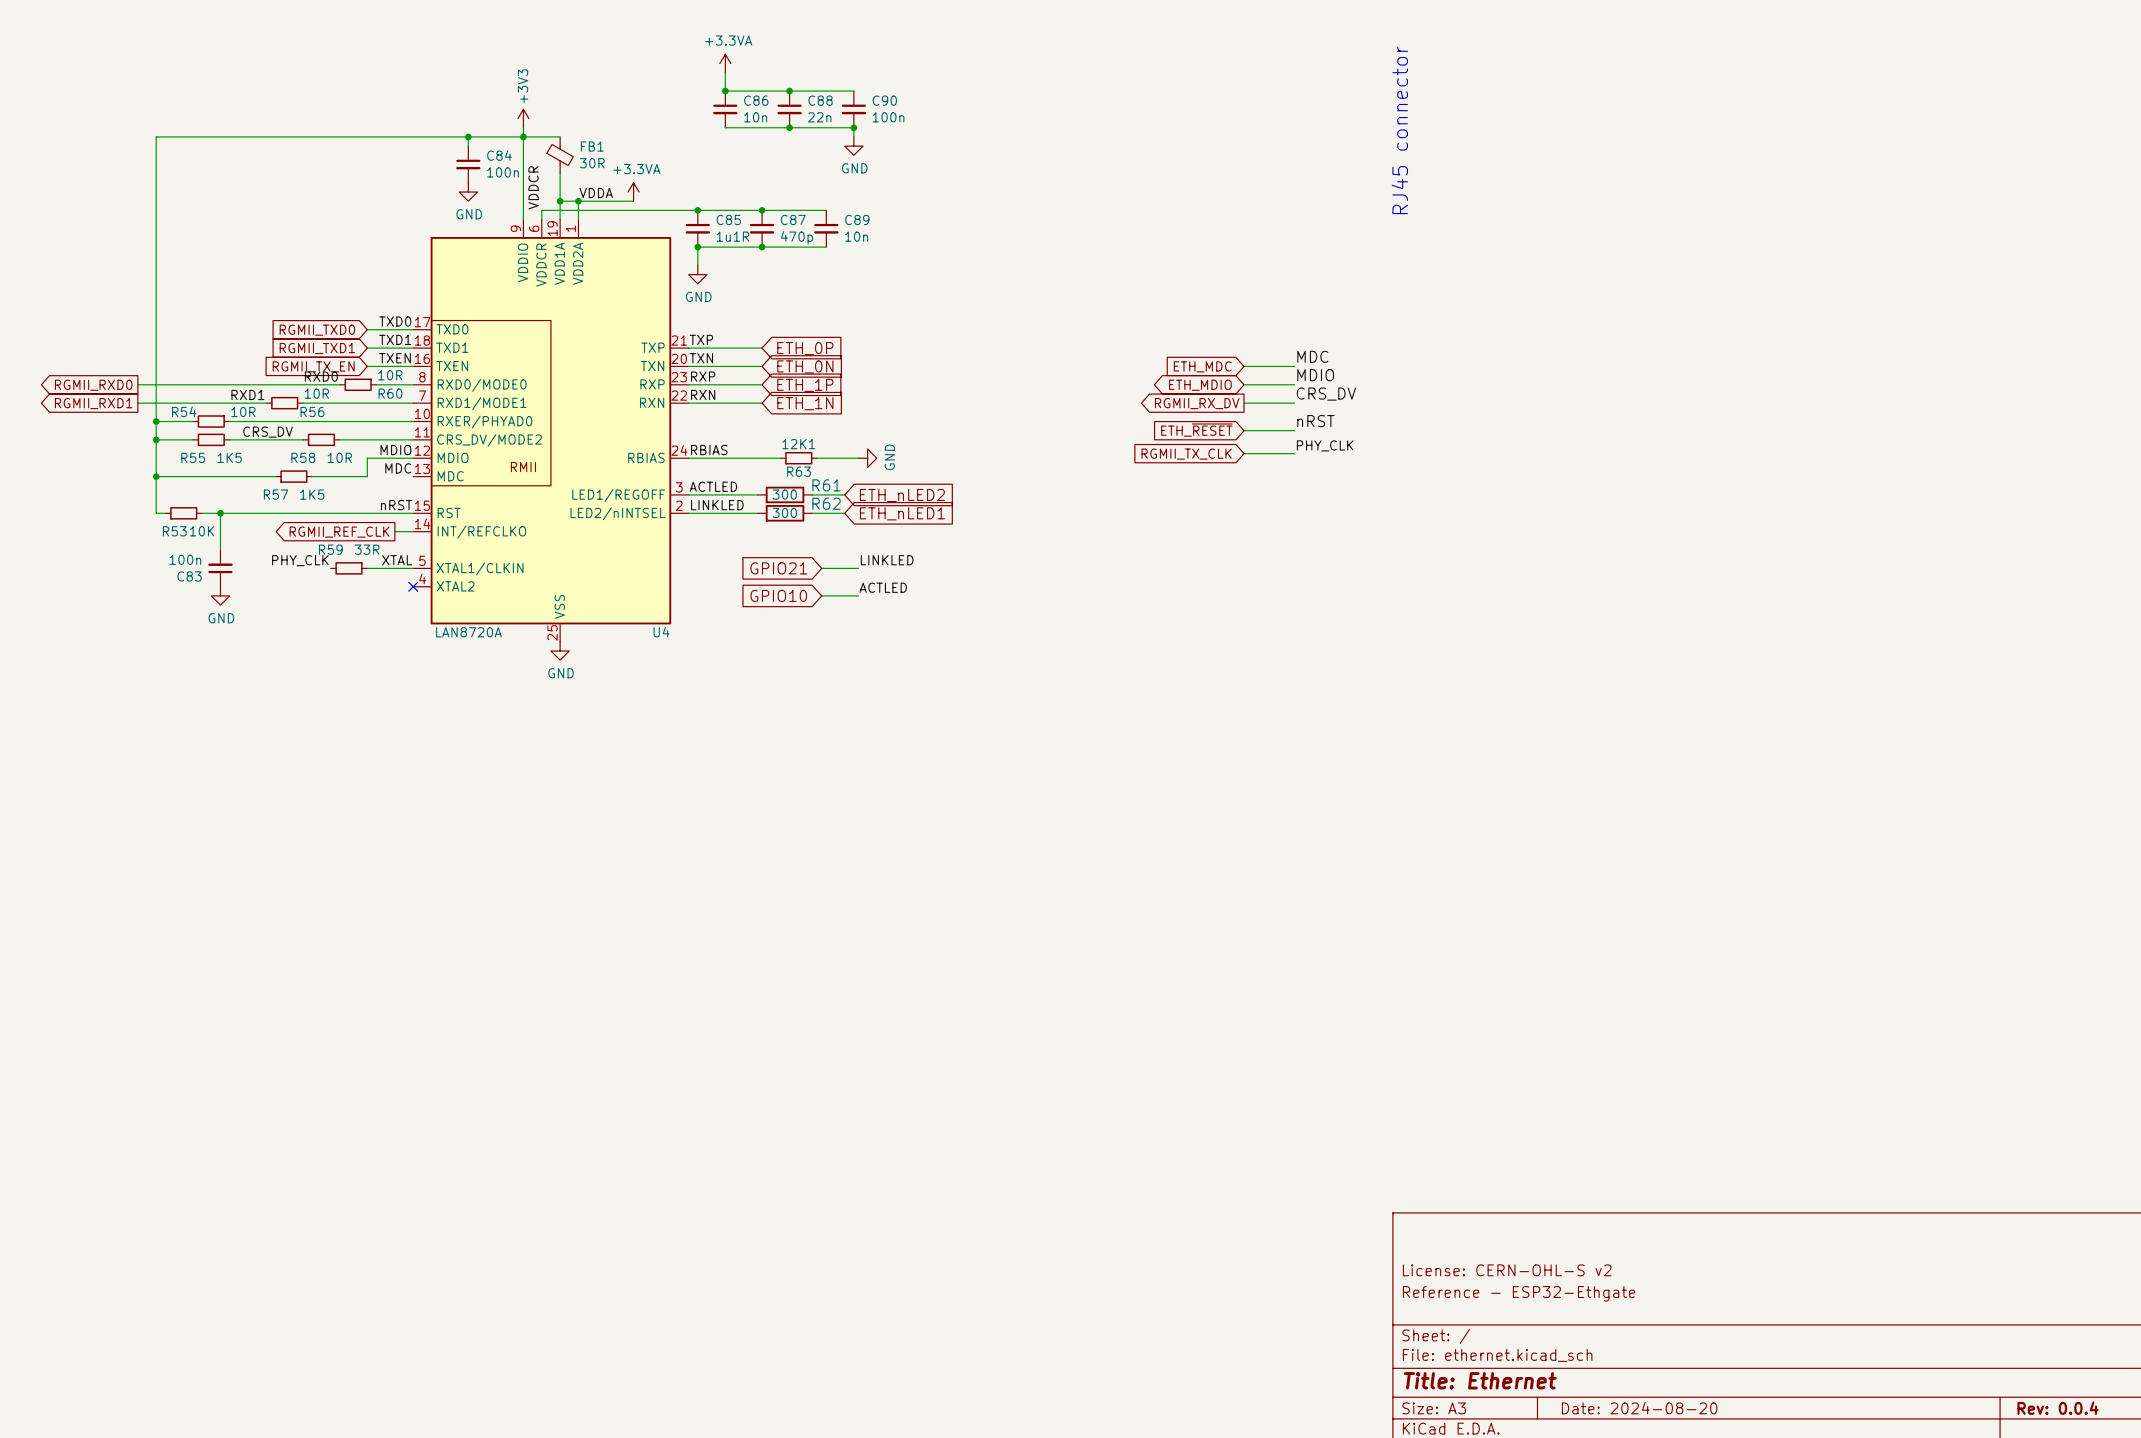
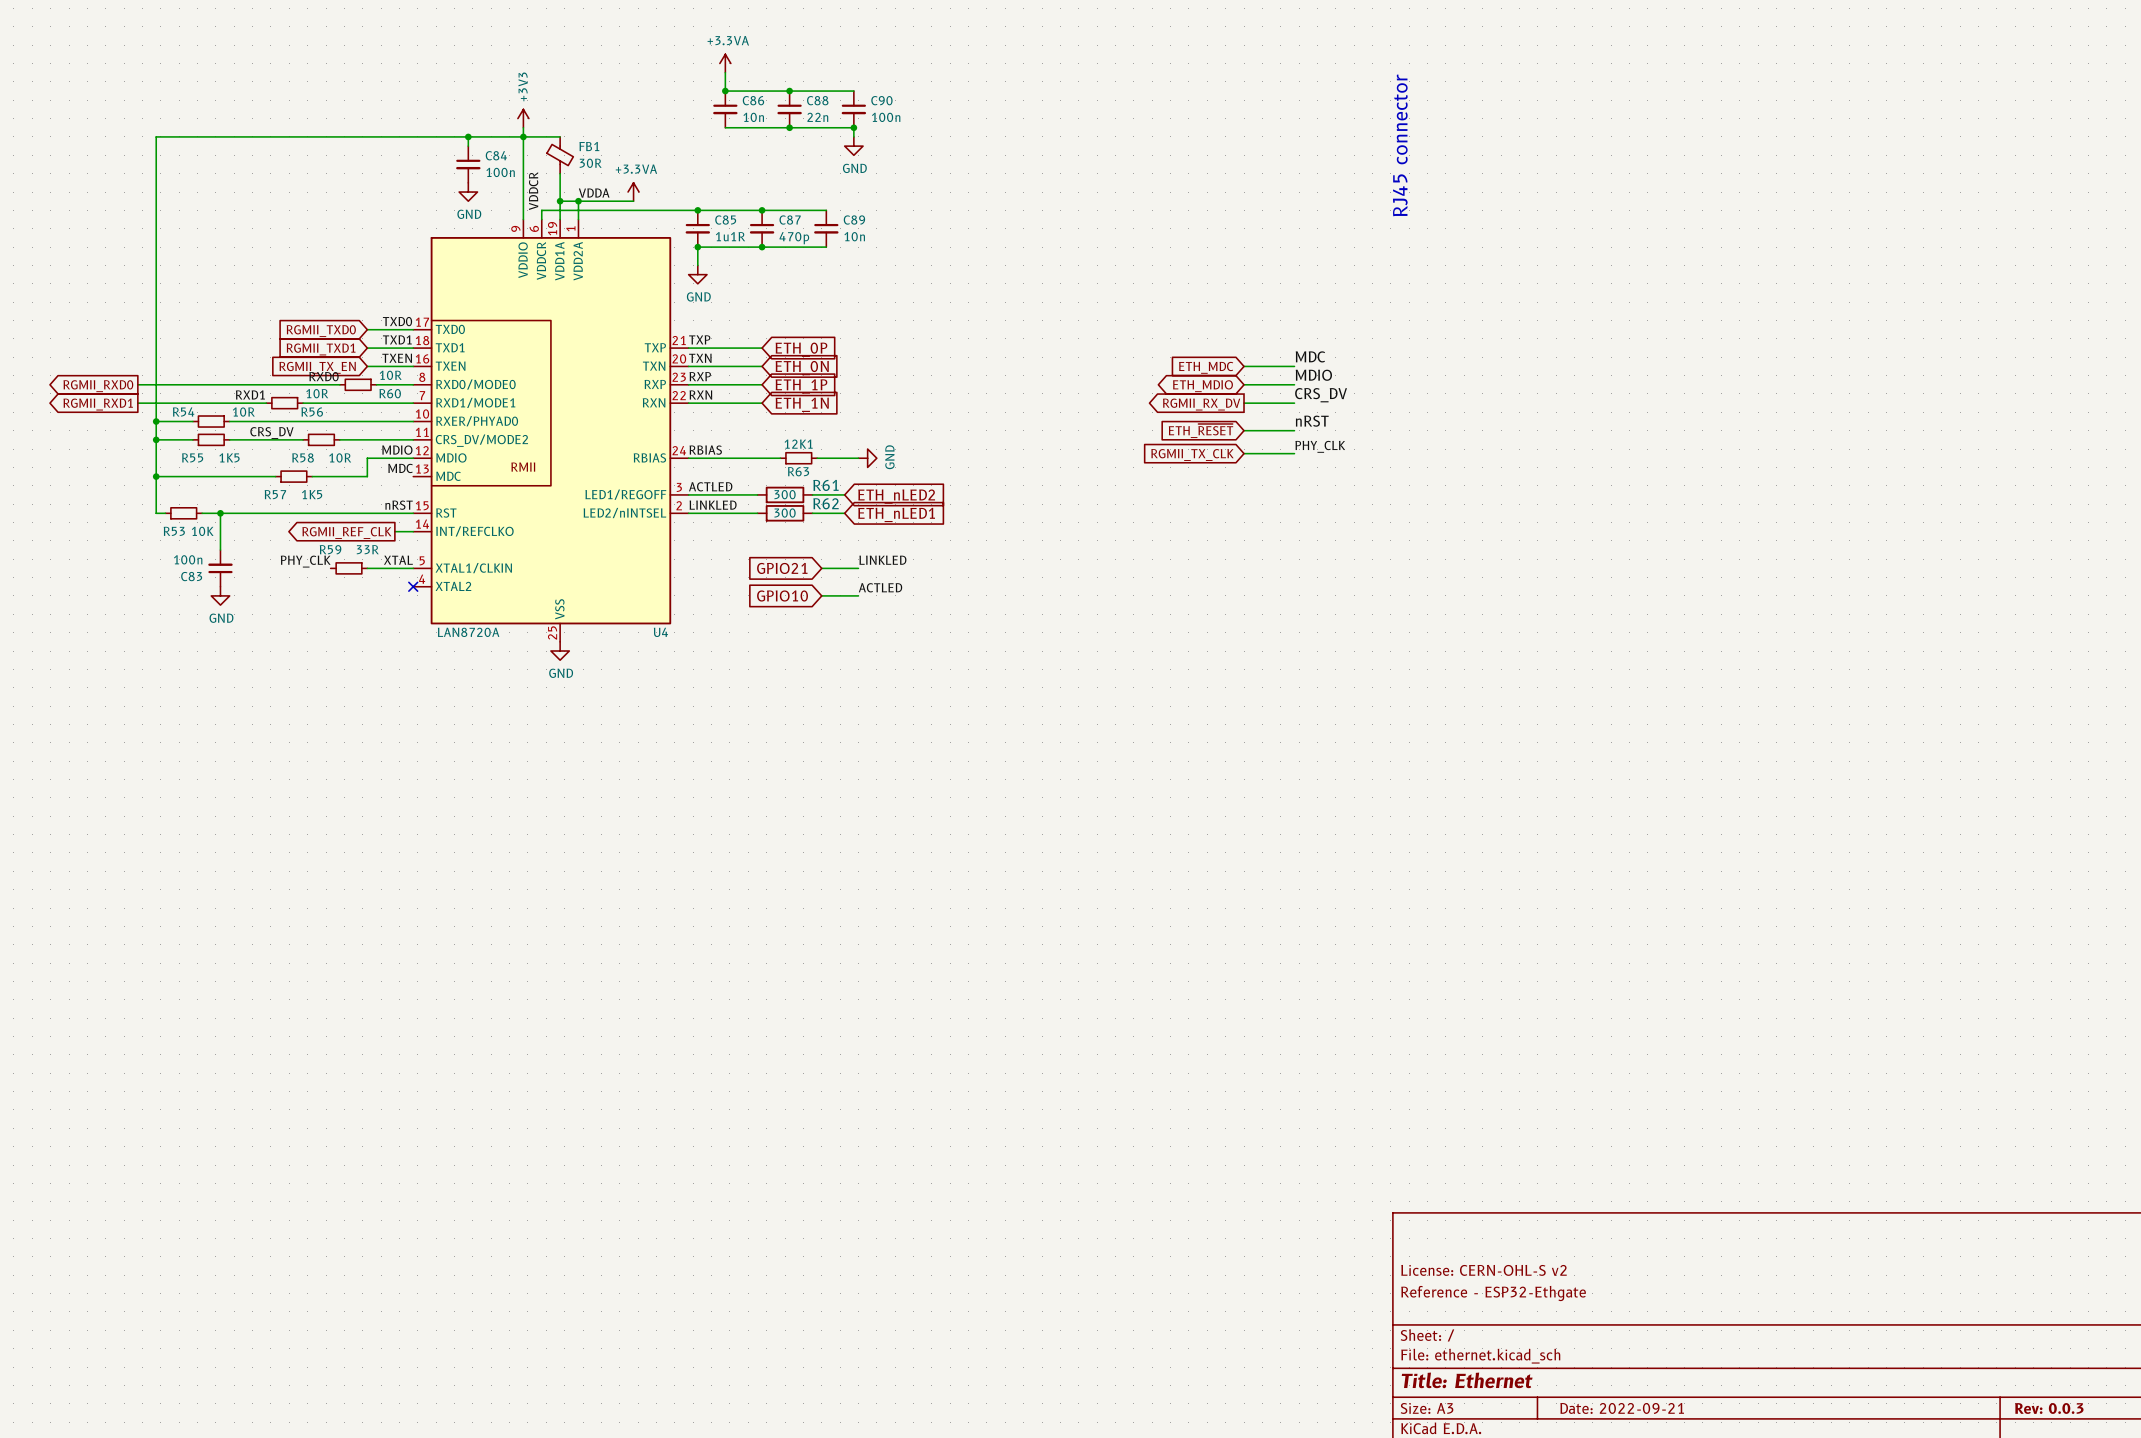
title block: Date: 2024-08-20 (1639, 1408) -> Date: 2022-09-21 (1622, 1408)
title block: Rev: 0.0.4 (2058, 1408) -> Rev: 0.0.3 (2049, 1408)

